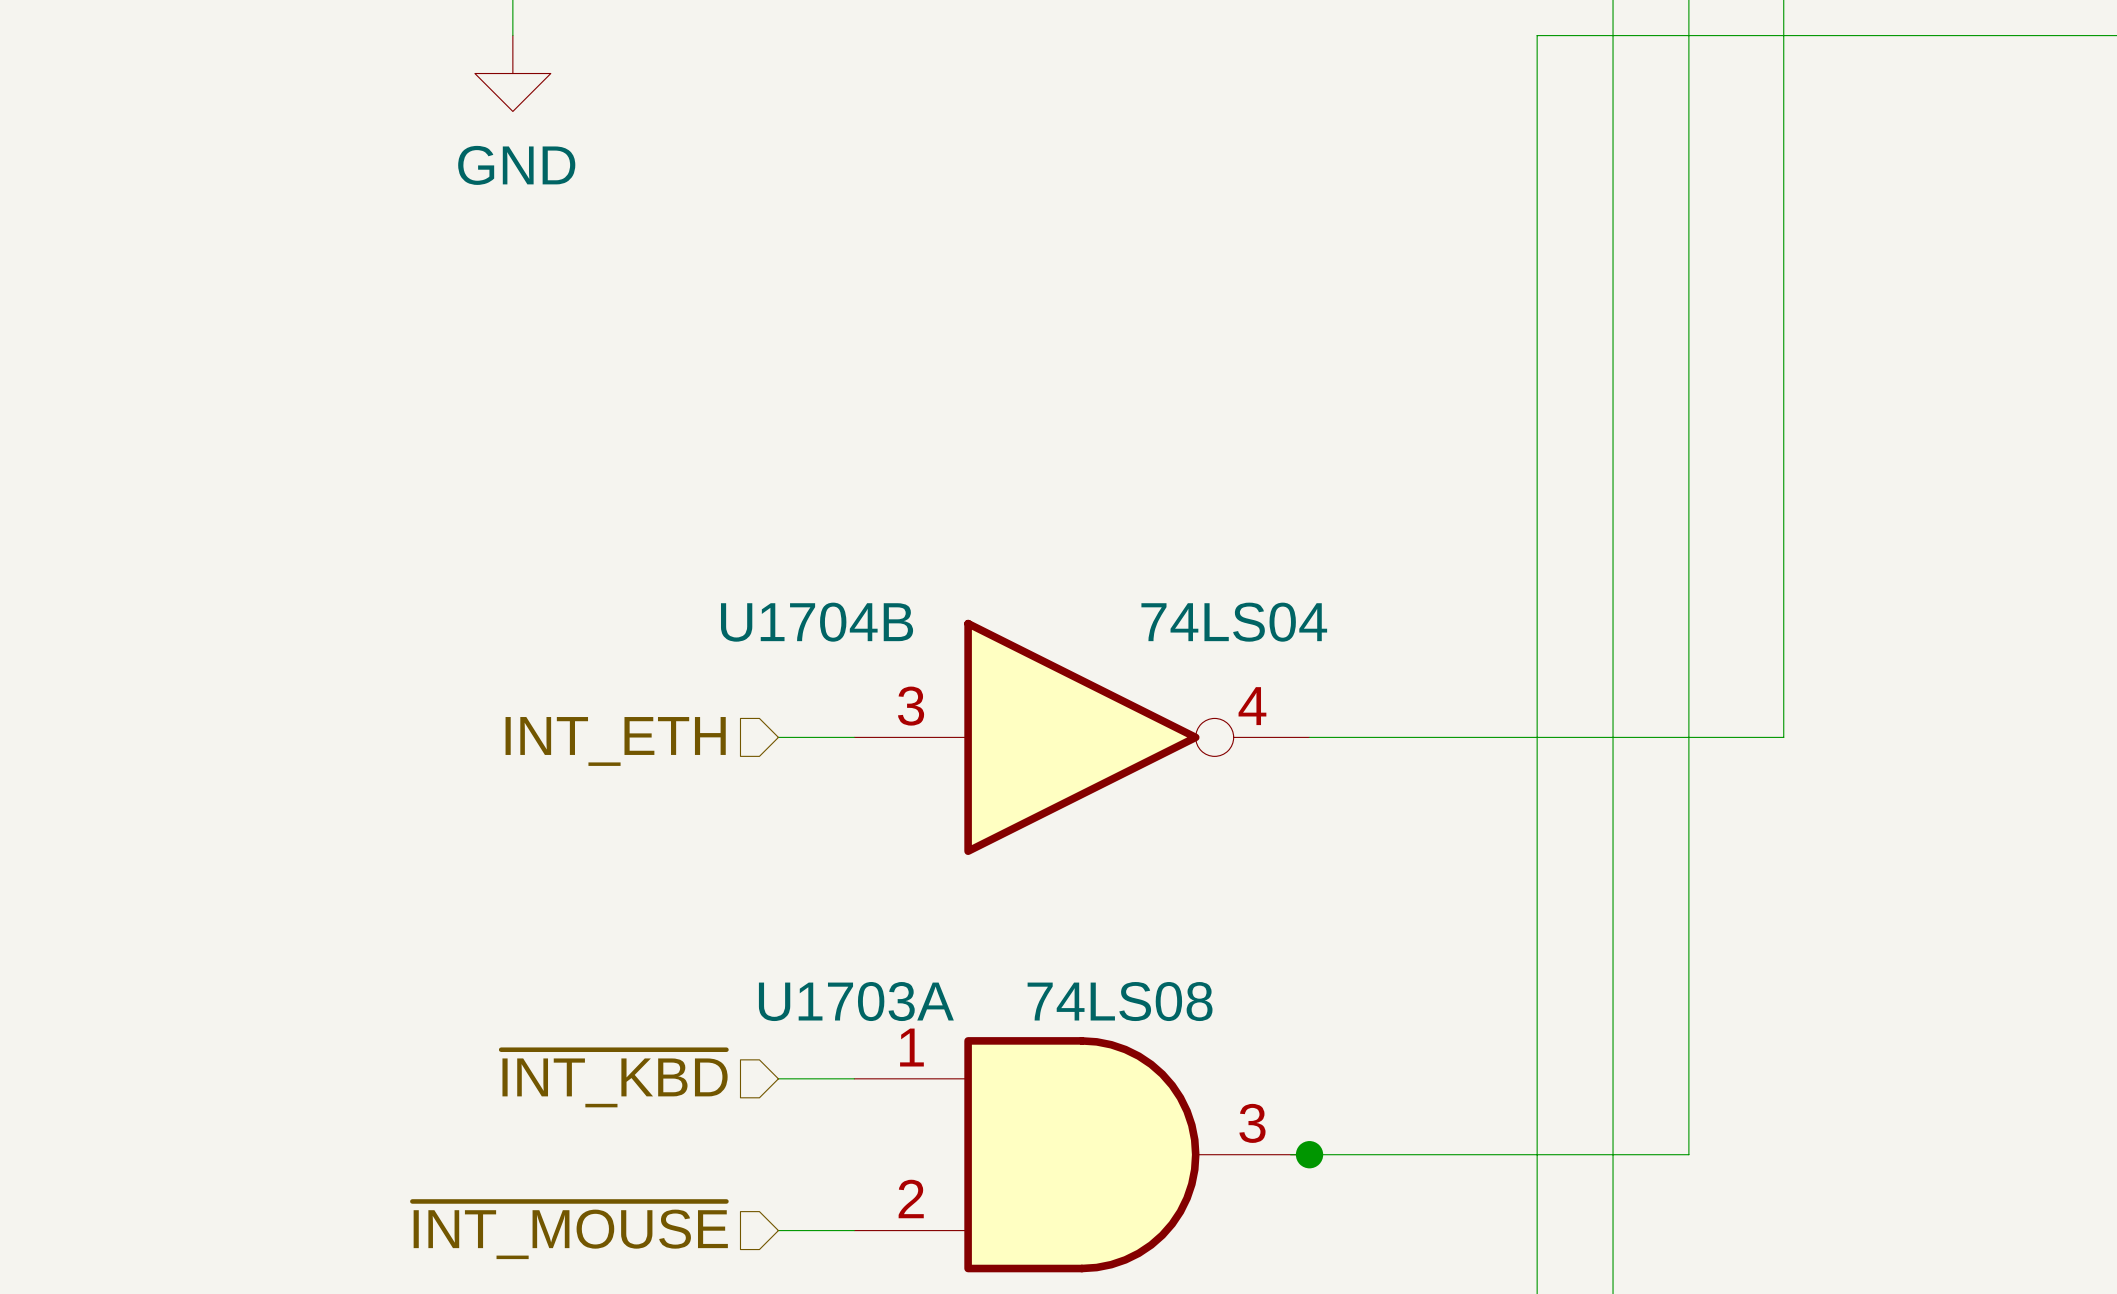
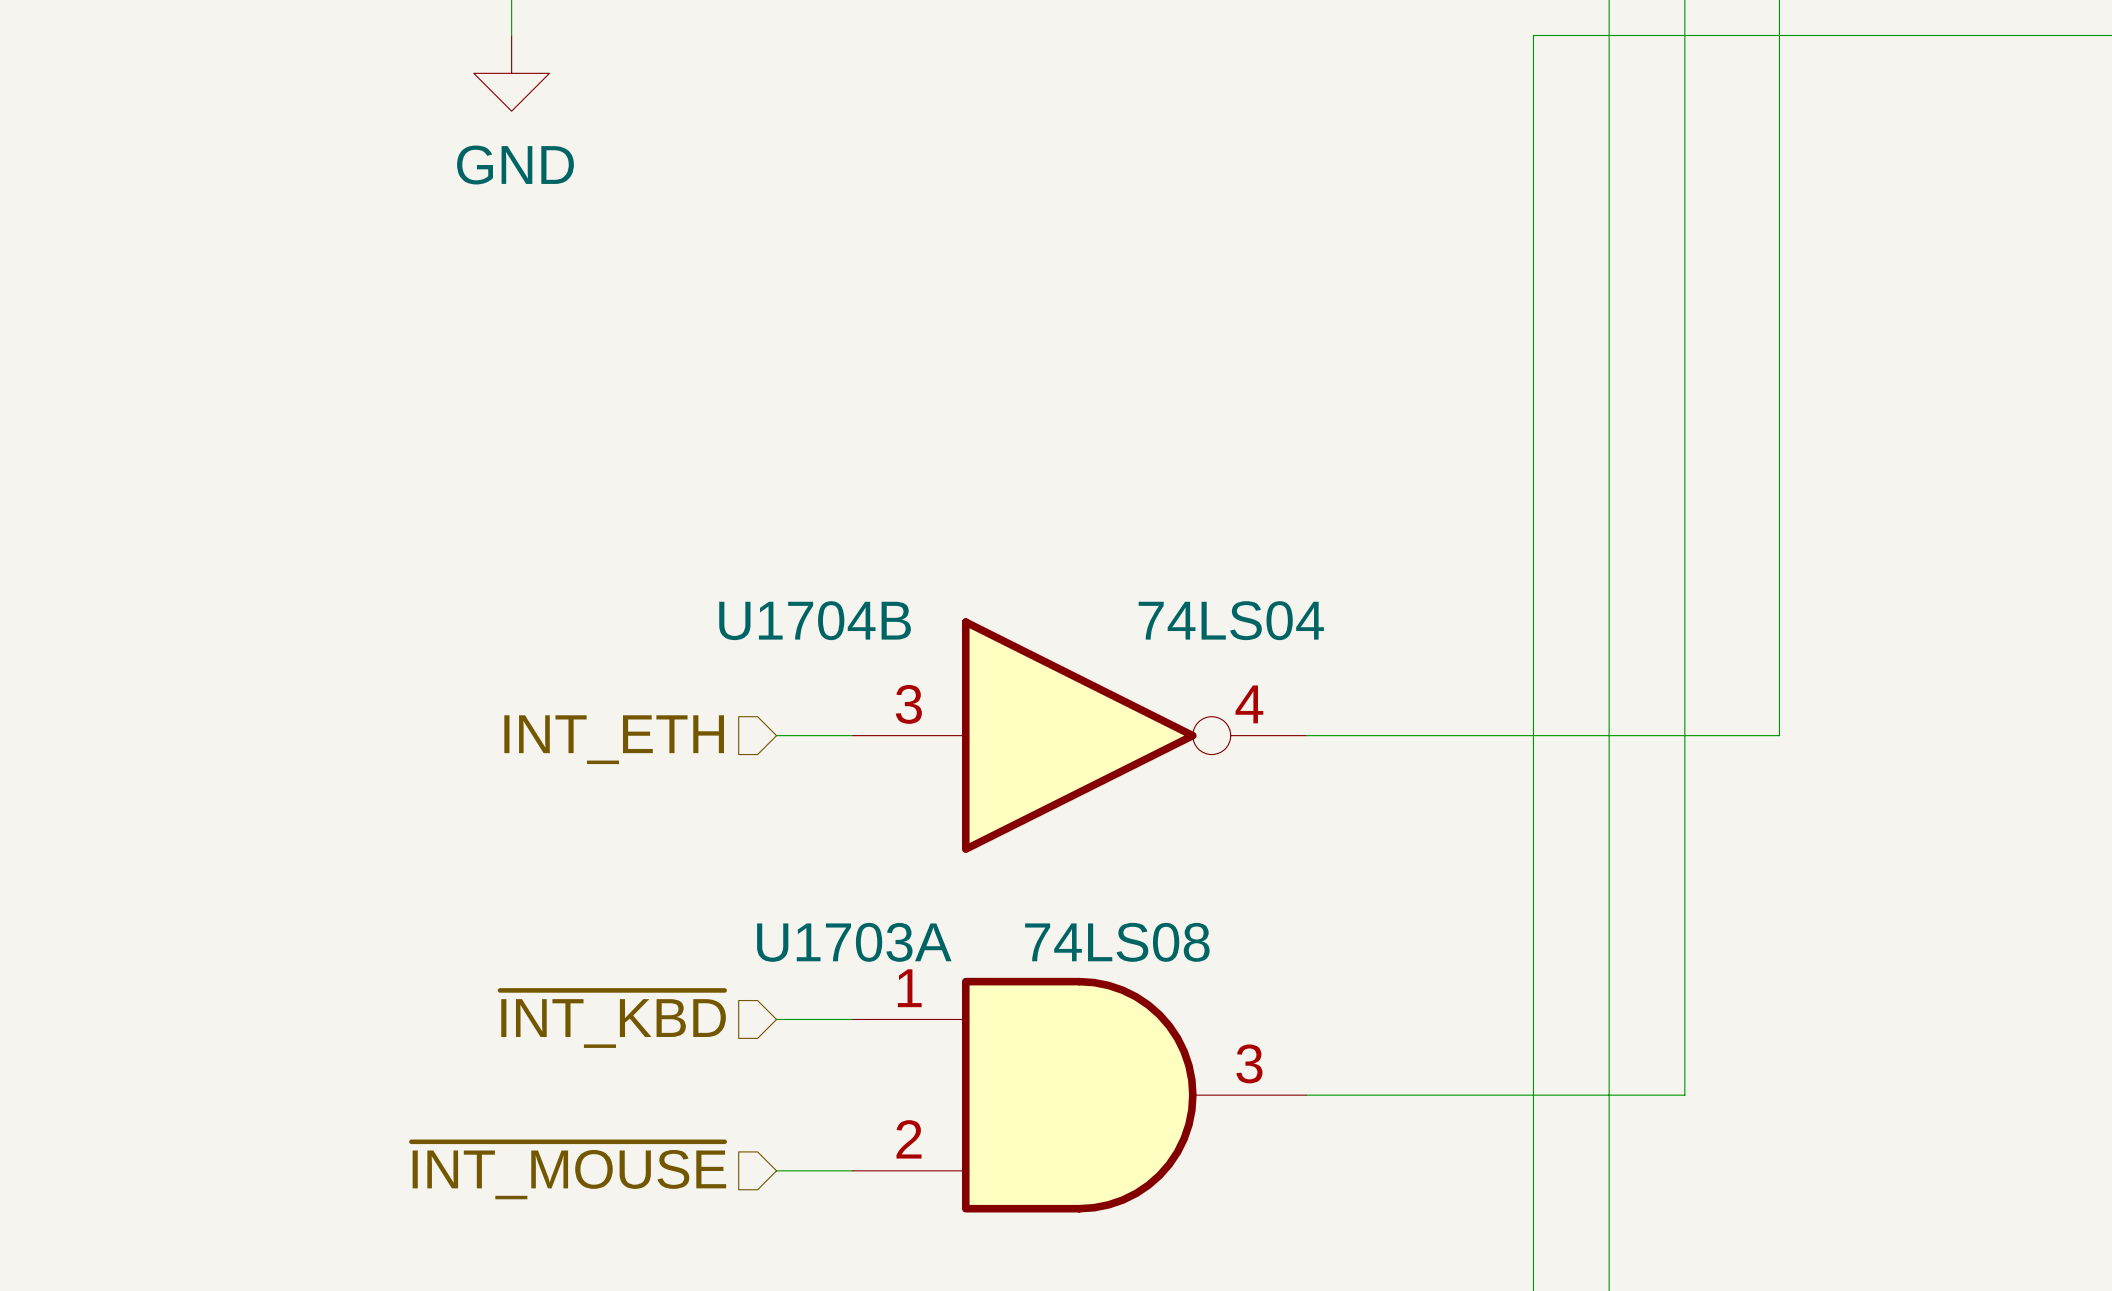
hierarchical label position: ~{INT_KBD} (614, 1078) -> ~{INT_KBD} (612, 1019)
wire: (778, 1078) (854, 1078) -> (776, 1019) (852, 1019)
wire: (1688, 1097) (1688, 1154) (1290, 1154) -> (1684, 1095) (1306, 1095)
U1703A position: (1081, 1154) -> (1079, 1095)
junction: (1309, 1154) -> none
hierarchical label position: ~{INT_MOUSE} (570, 1230) -> ~{INT_MOUSE} (568, 1170)
wire: (778, 1230) (854, 1230) -> (776, 1170) (852, 1170)

